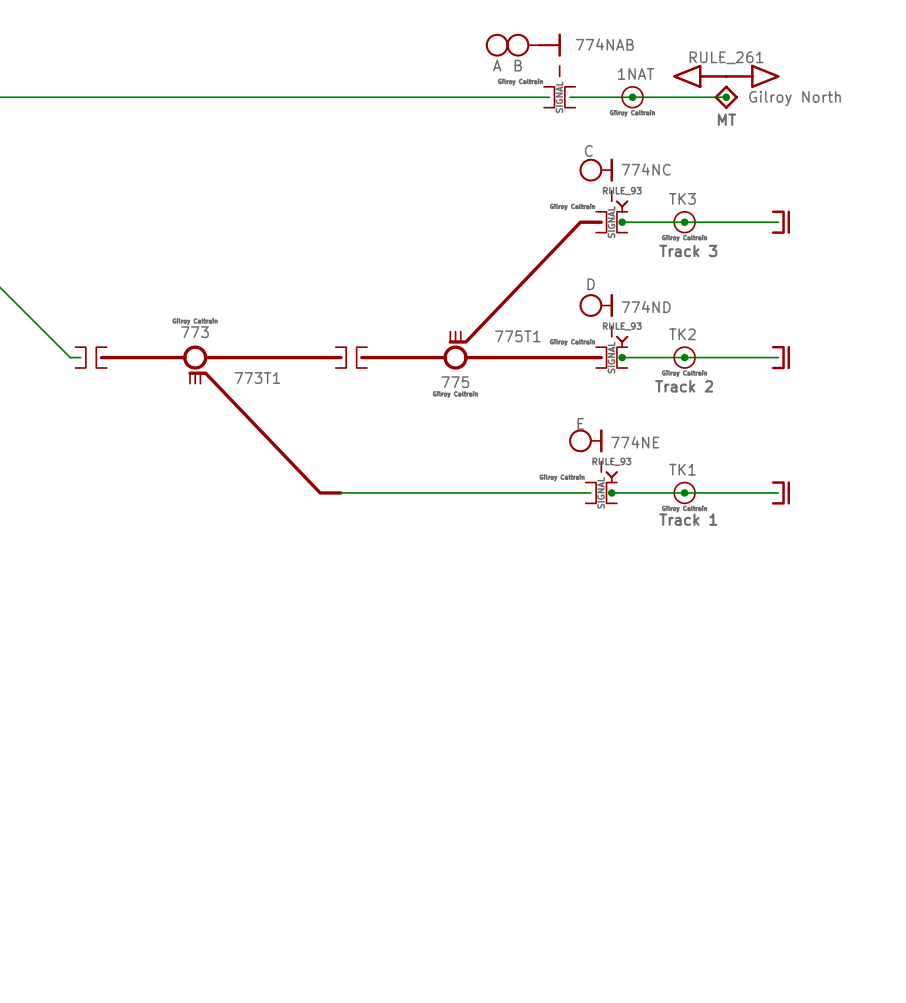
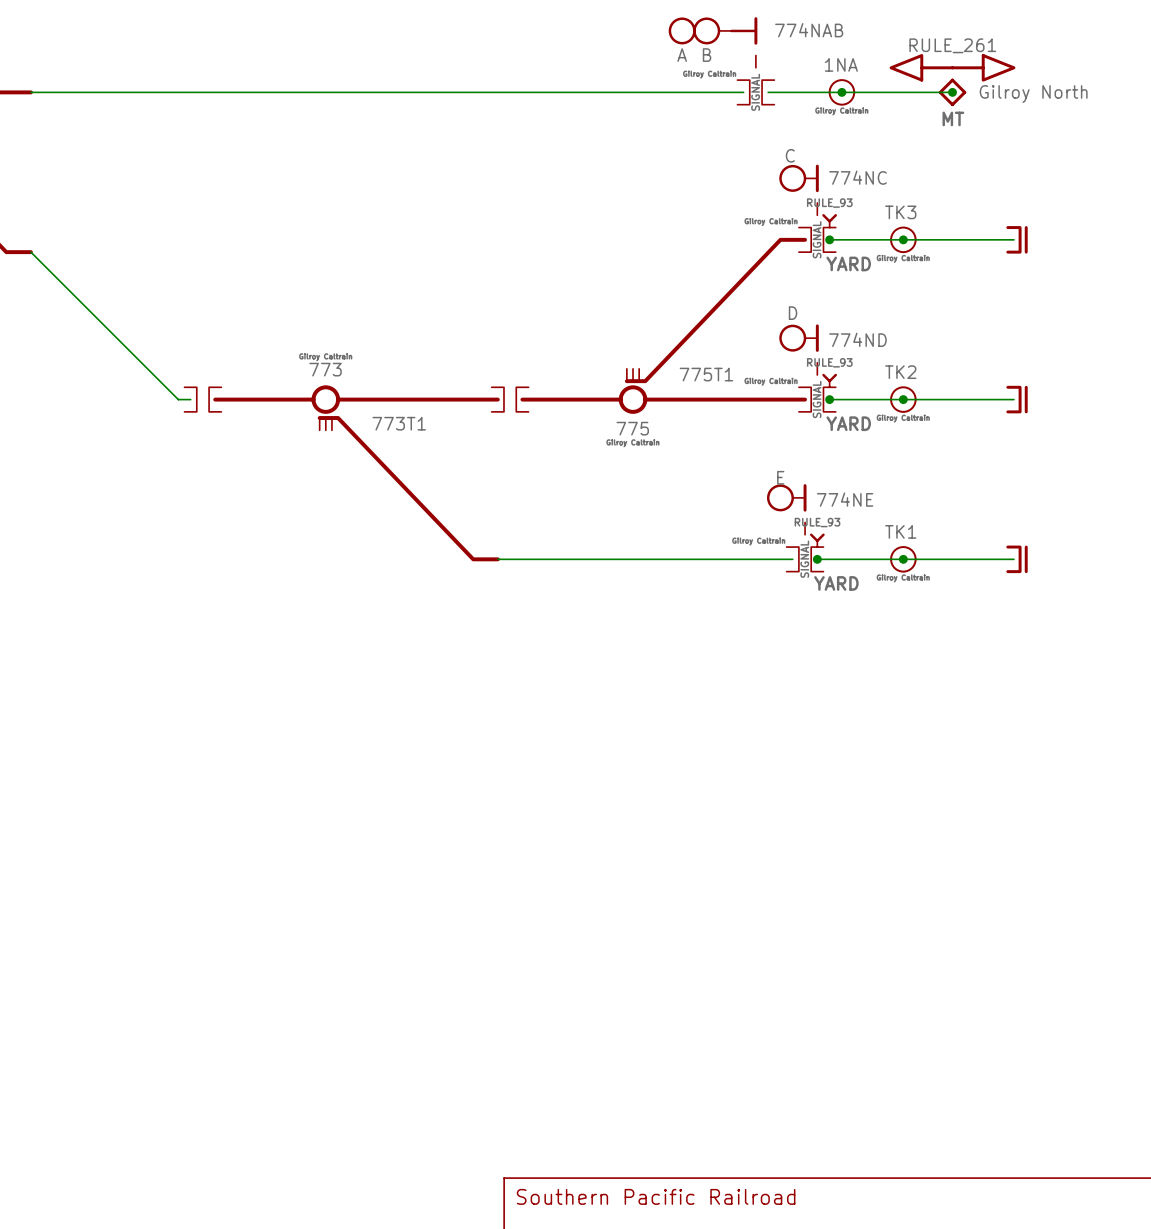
part value: 1NAT (636, 73) -> 1NA (841, 64)
part value: Track 3 (688, 250) -> YARD (848, 263)
part value: Track 2 (684, 386) -> YARD (848, 423)
part value: Track 1 (688, 519) -> YARD (836, 583)

